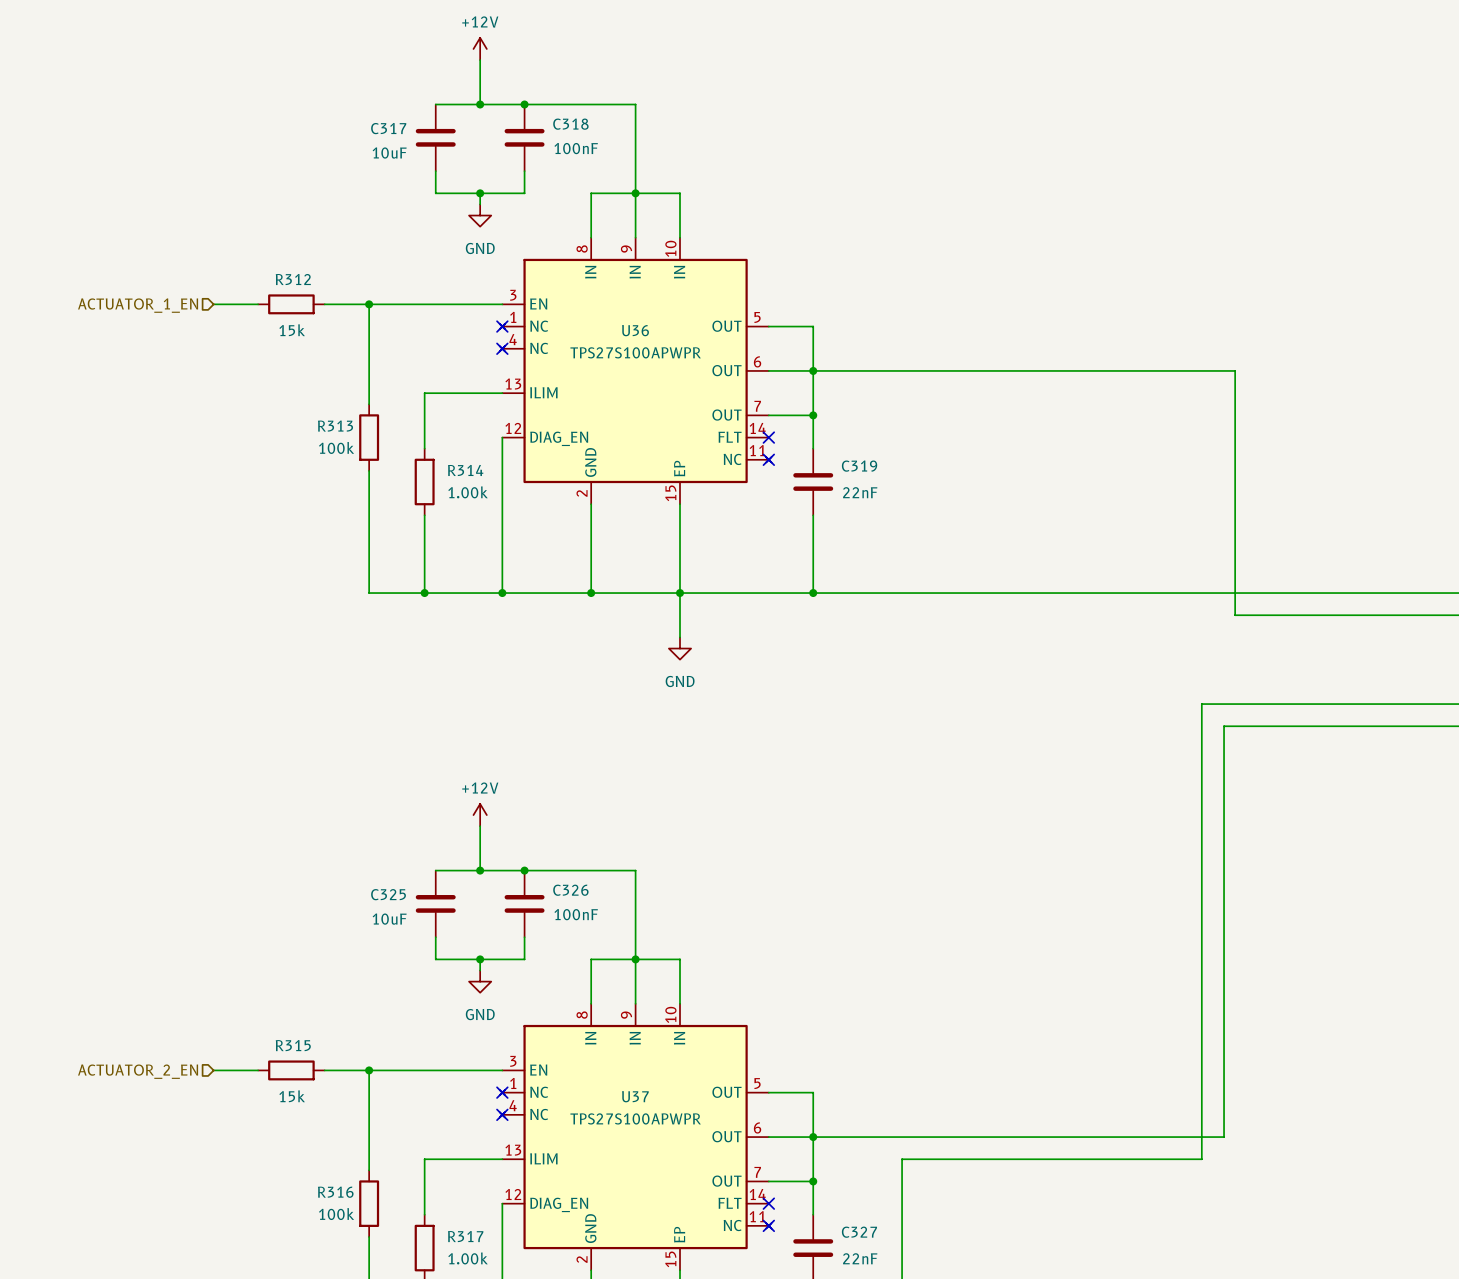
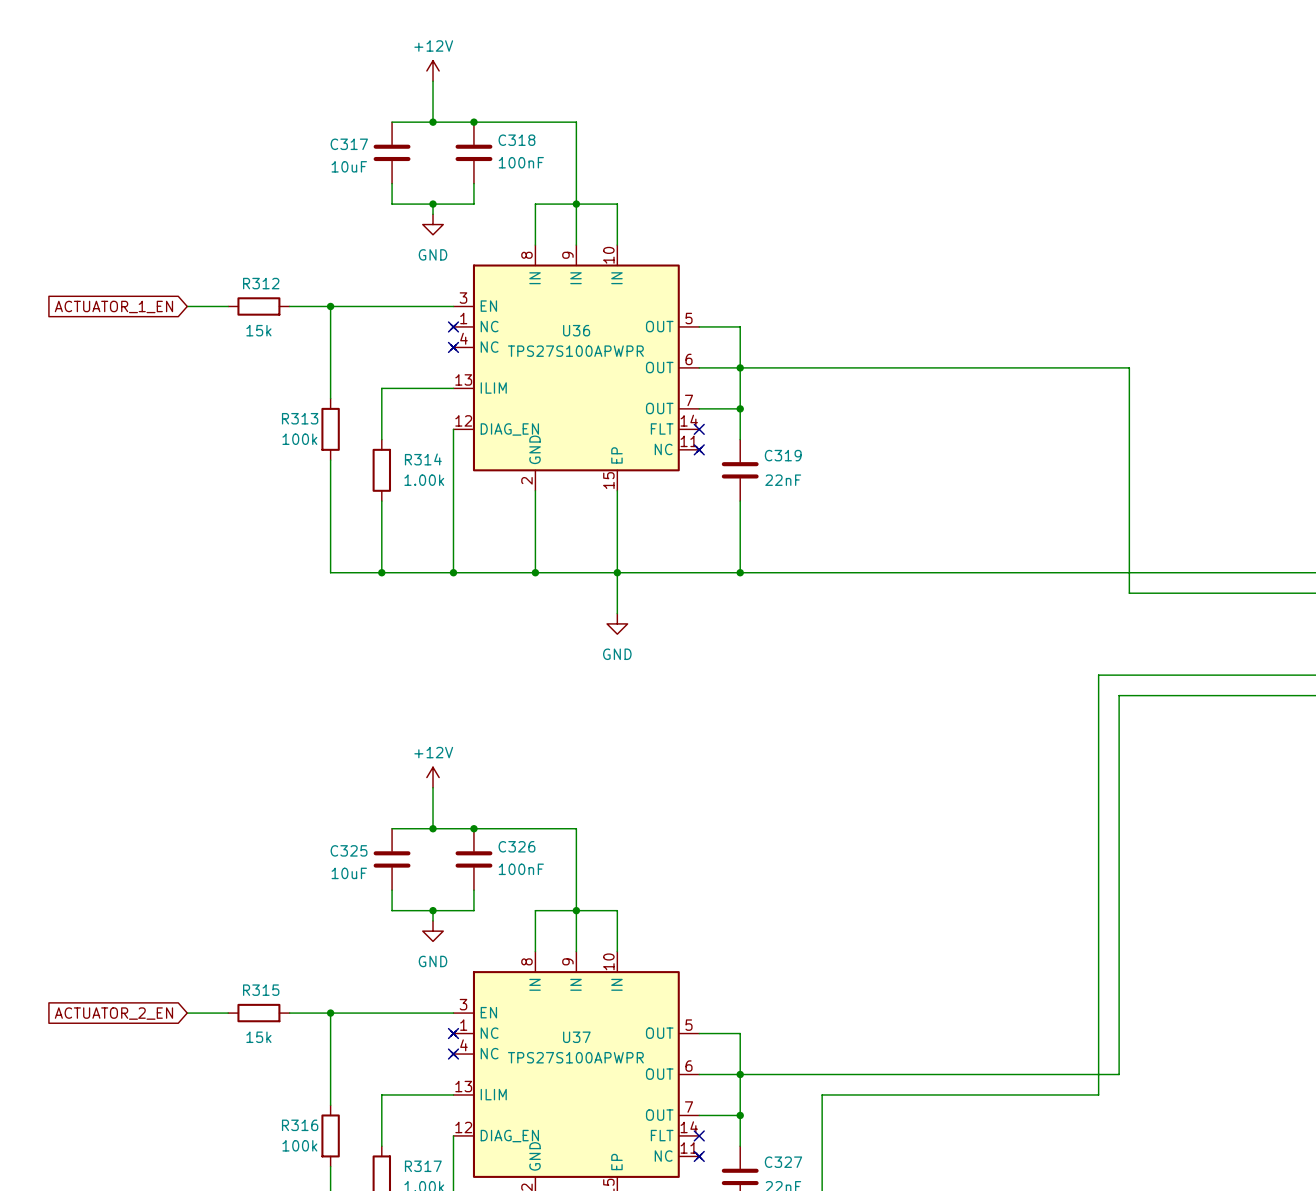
hierarchical label: ACTUATOR_1_EN (138, 305) -> none
global label: none -> ACTUATOR_1_EN (113, 306)
hierarchical label: ACTUATOR_2_EN (138, 1071) -> none
global label: none -> ACTUATOR_2_EN (113, 1013)

